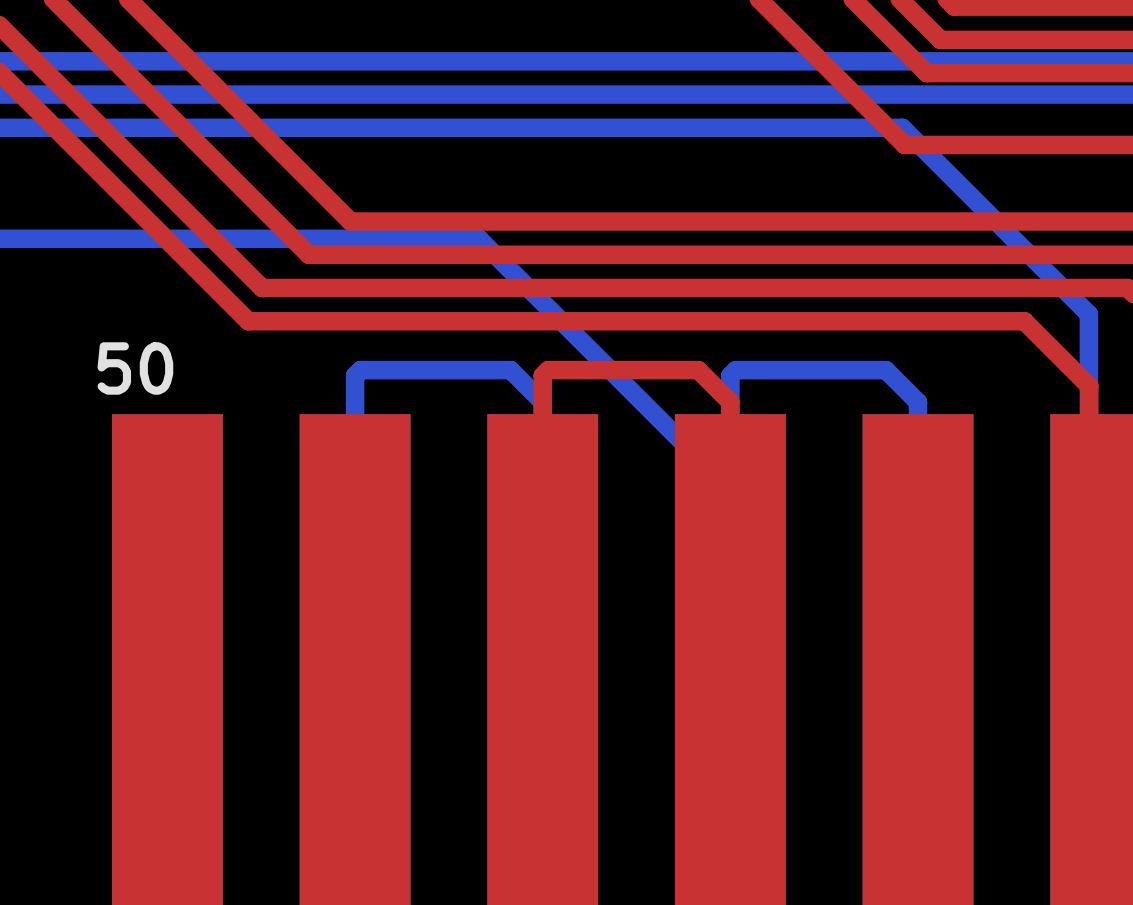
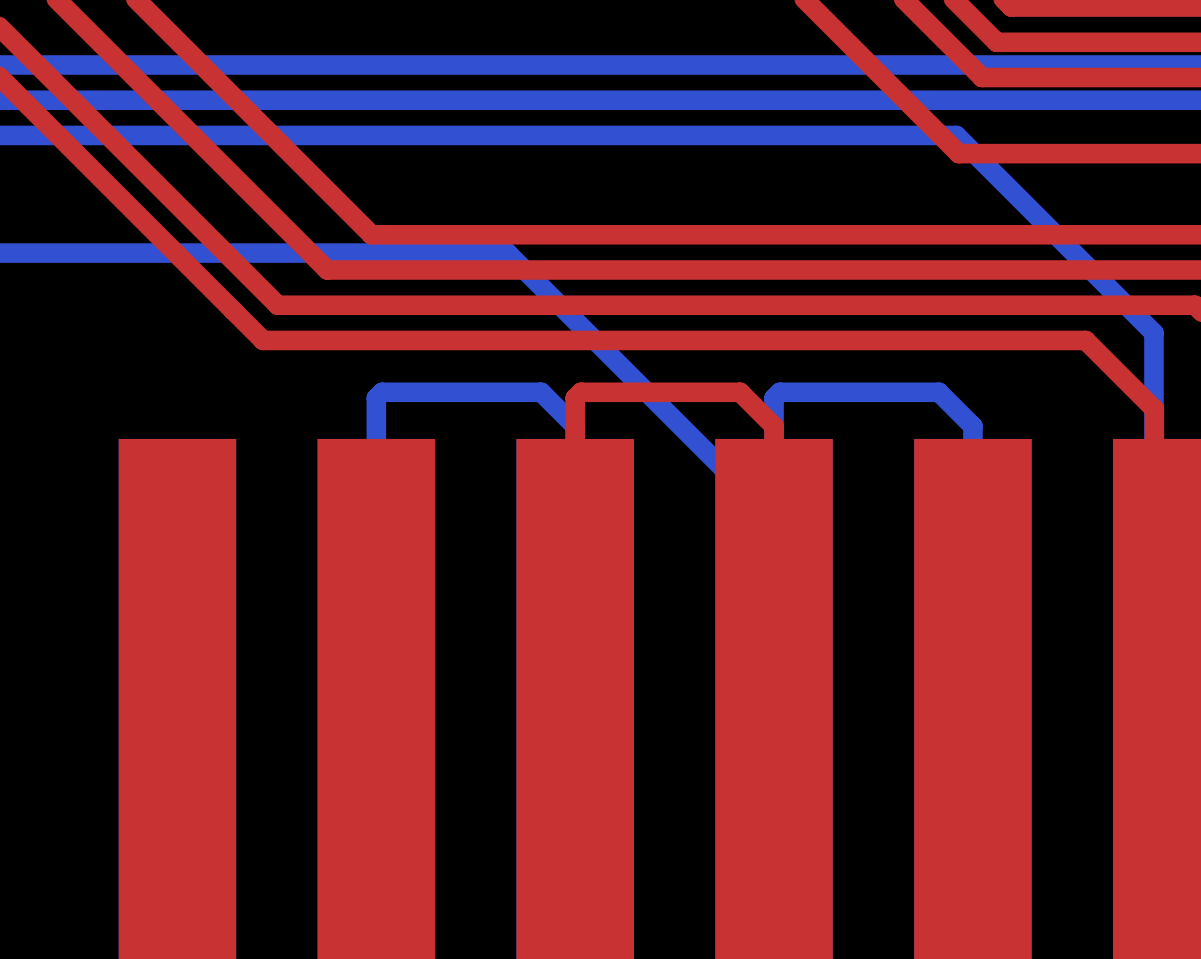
text: 50 (135, 368) -> none

